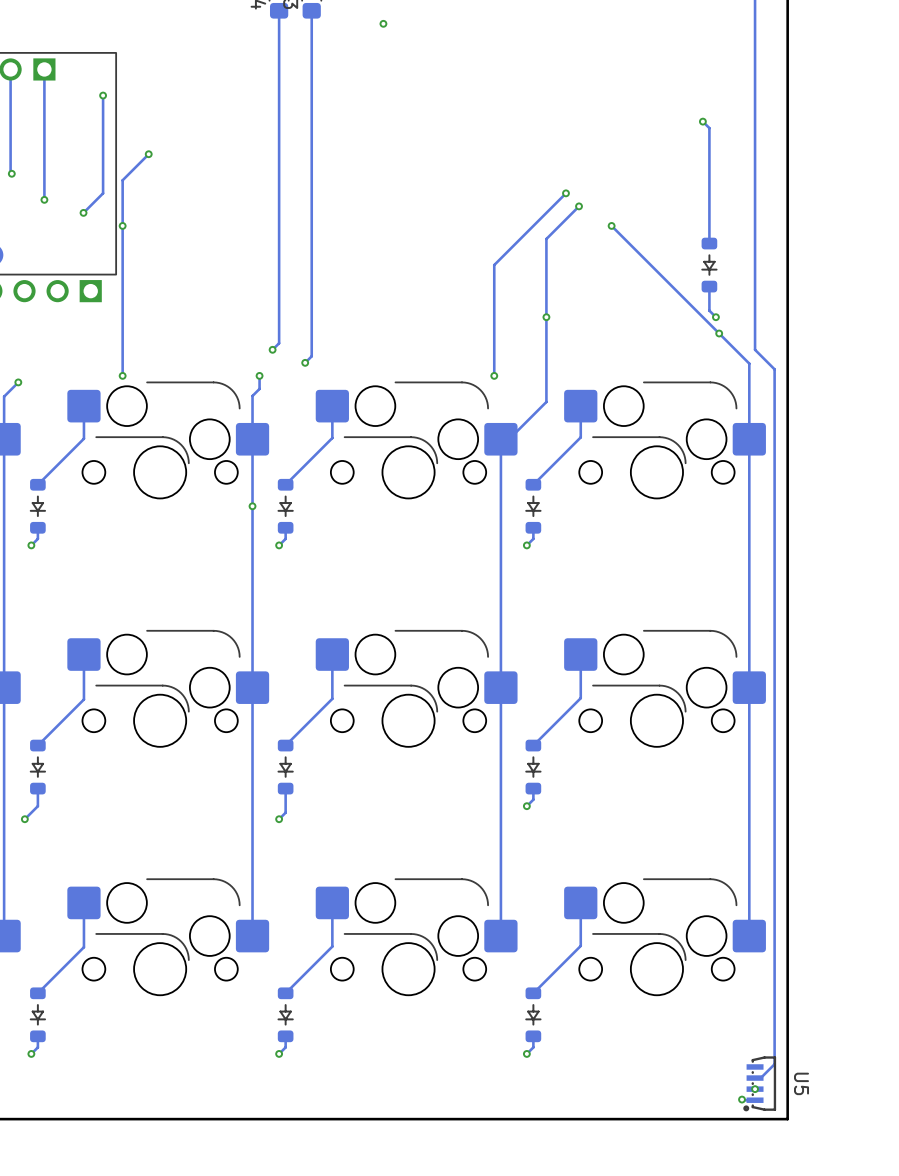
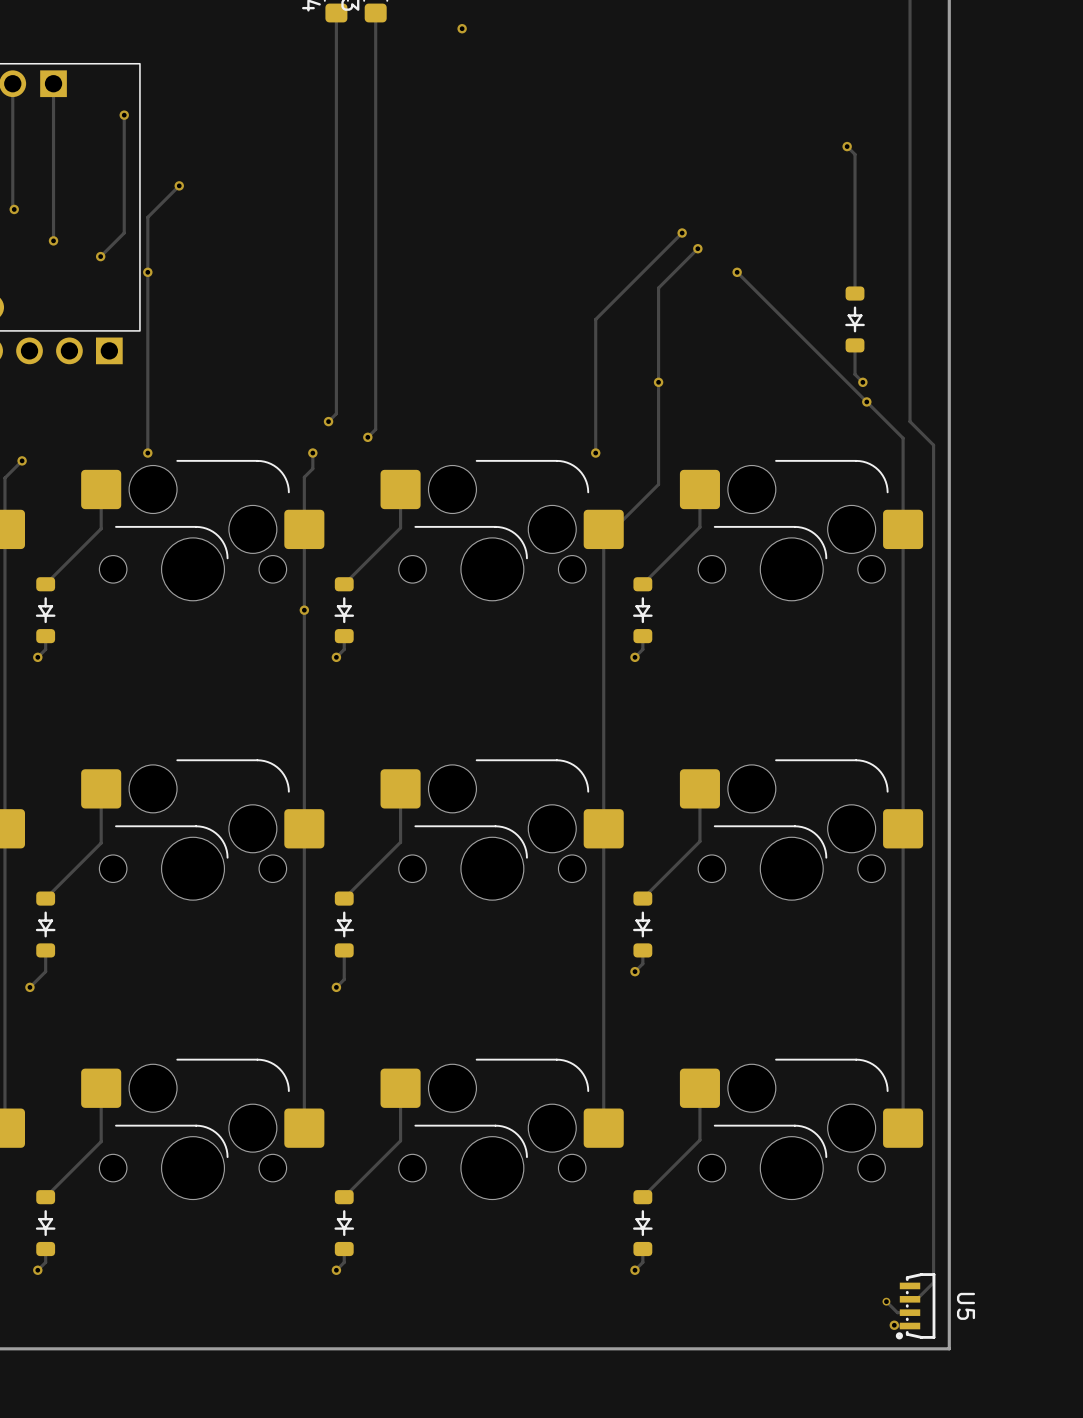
track: none -> (886, 1301) (897, 1312) (910, 1312)
via: none -> (886, 1301)
via: (755, 1089) -> none

